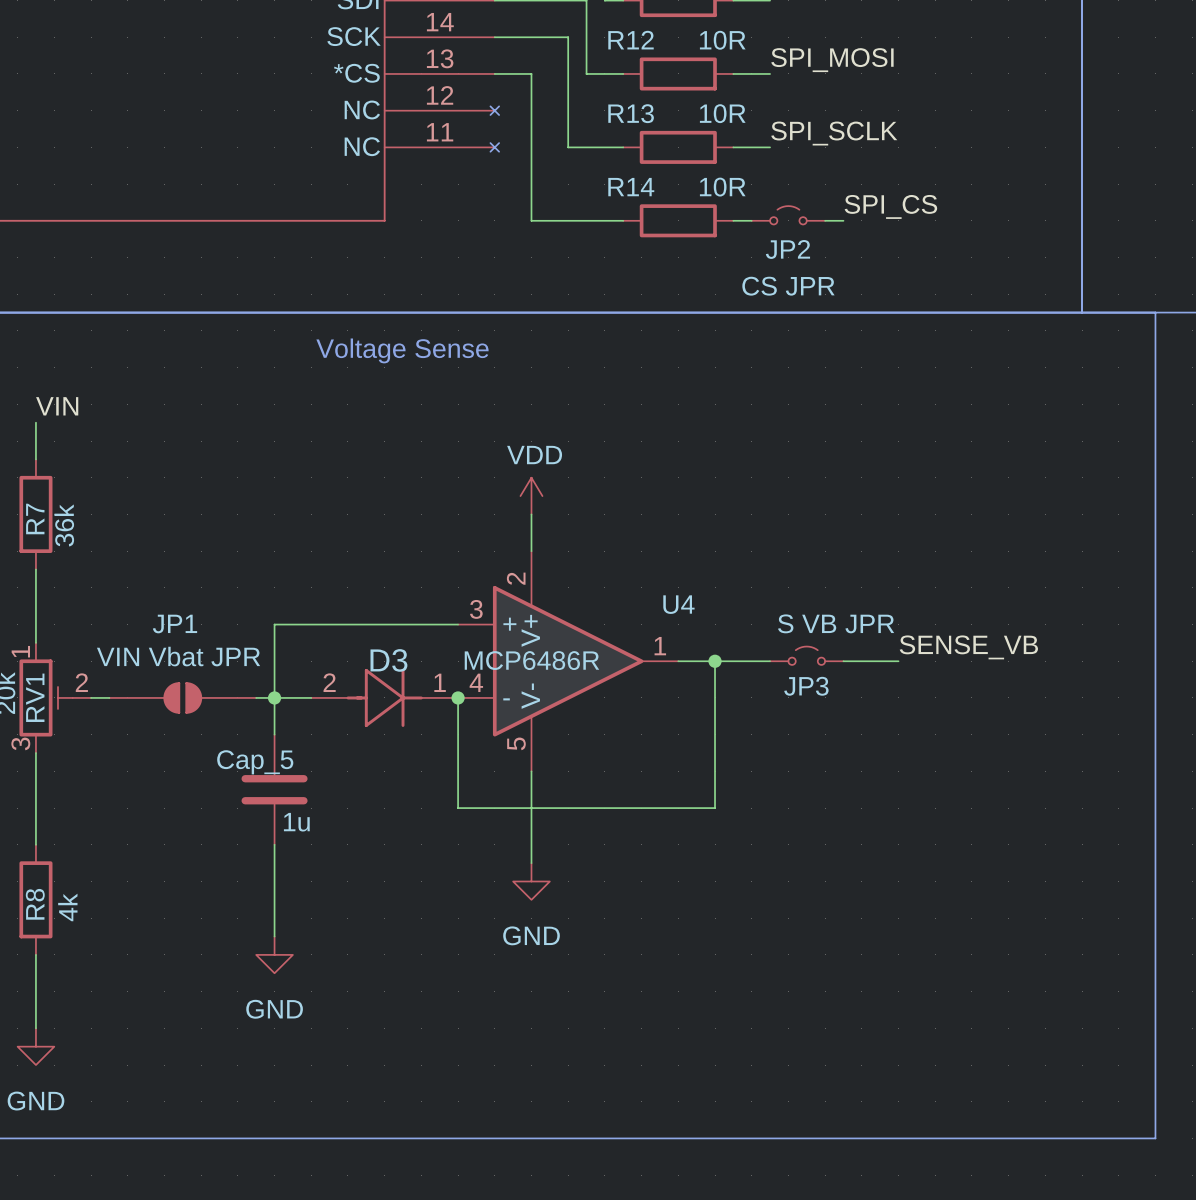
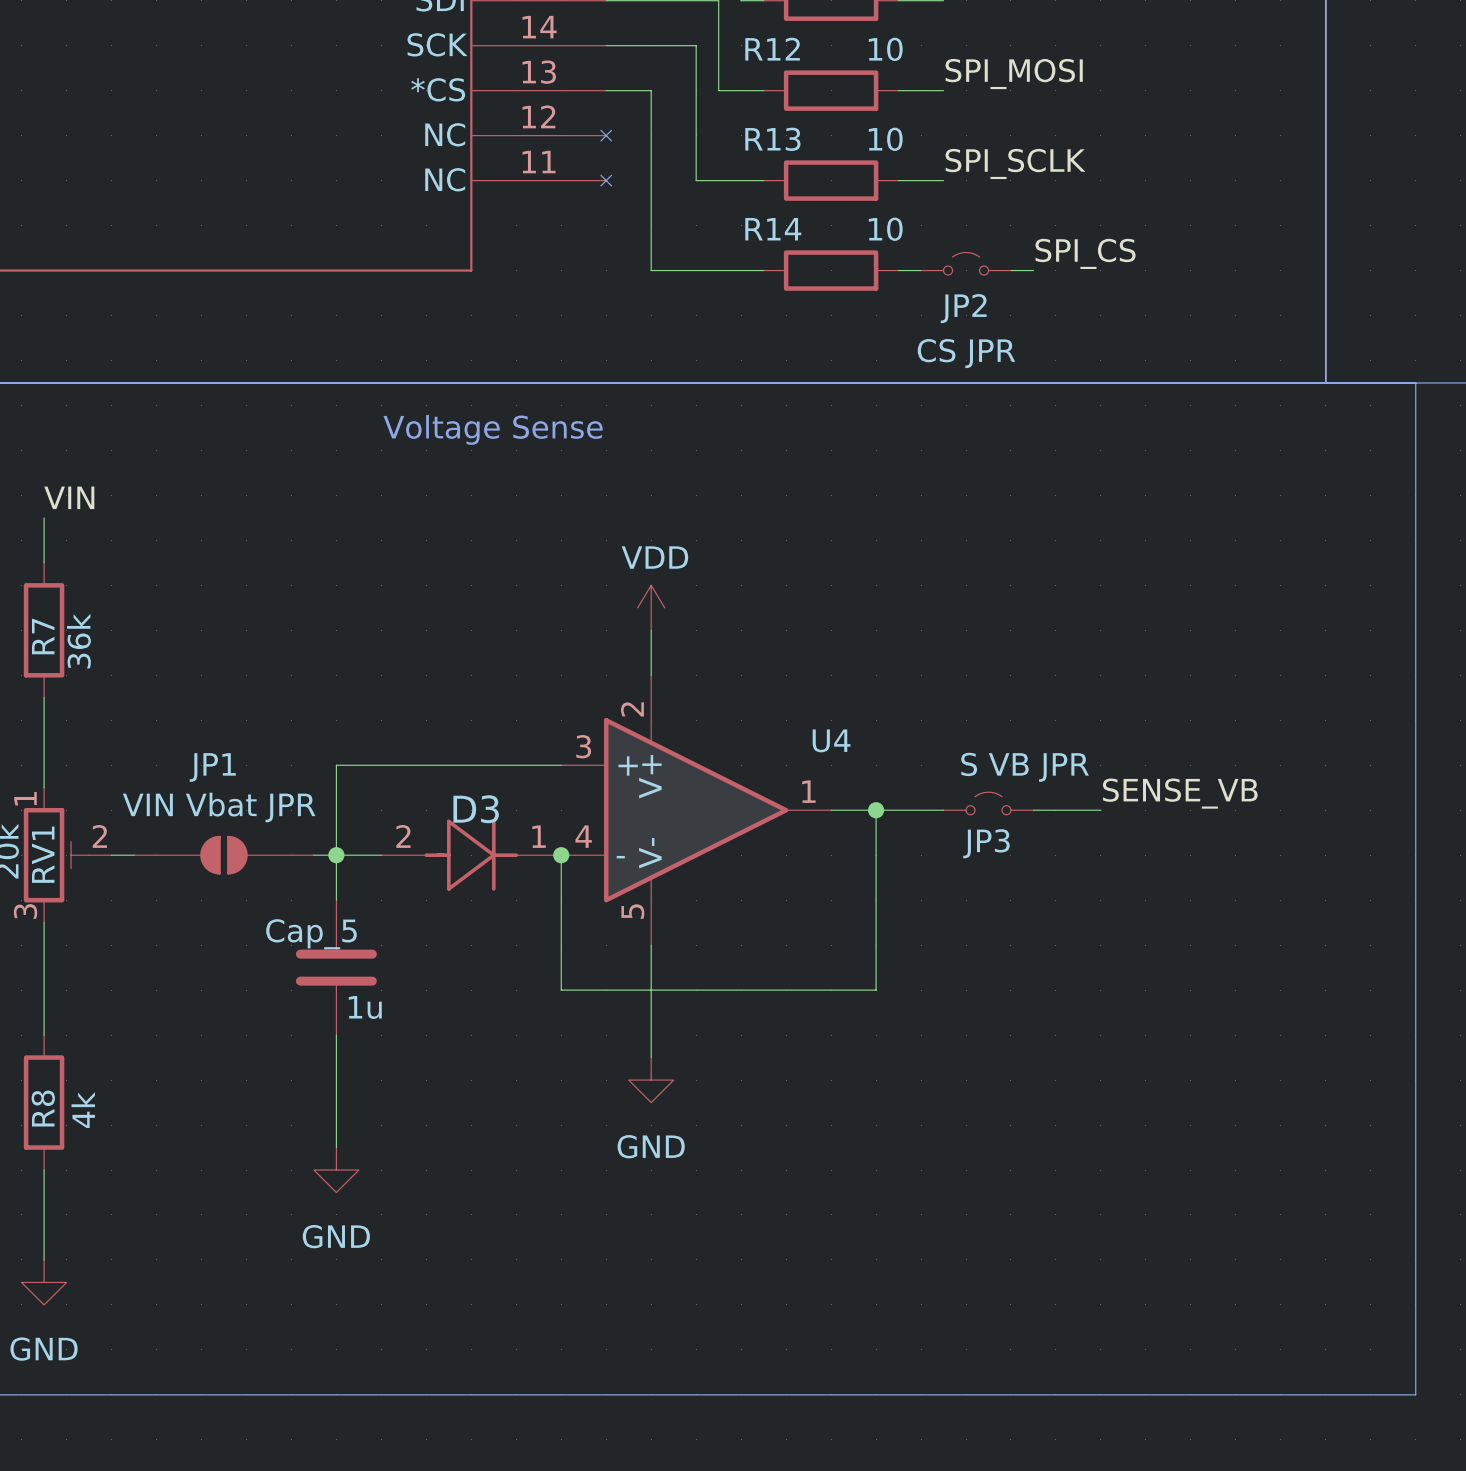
R12 value: 10R (722, 40) -> 10 (885, 49)
R13 value: 10R (722, 113) -> 10 (885, 139)
R14 value: 10R (722, 187) -> 10 (885, 229)
U4 value: MCP6486R (531, 660) -> none

